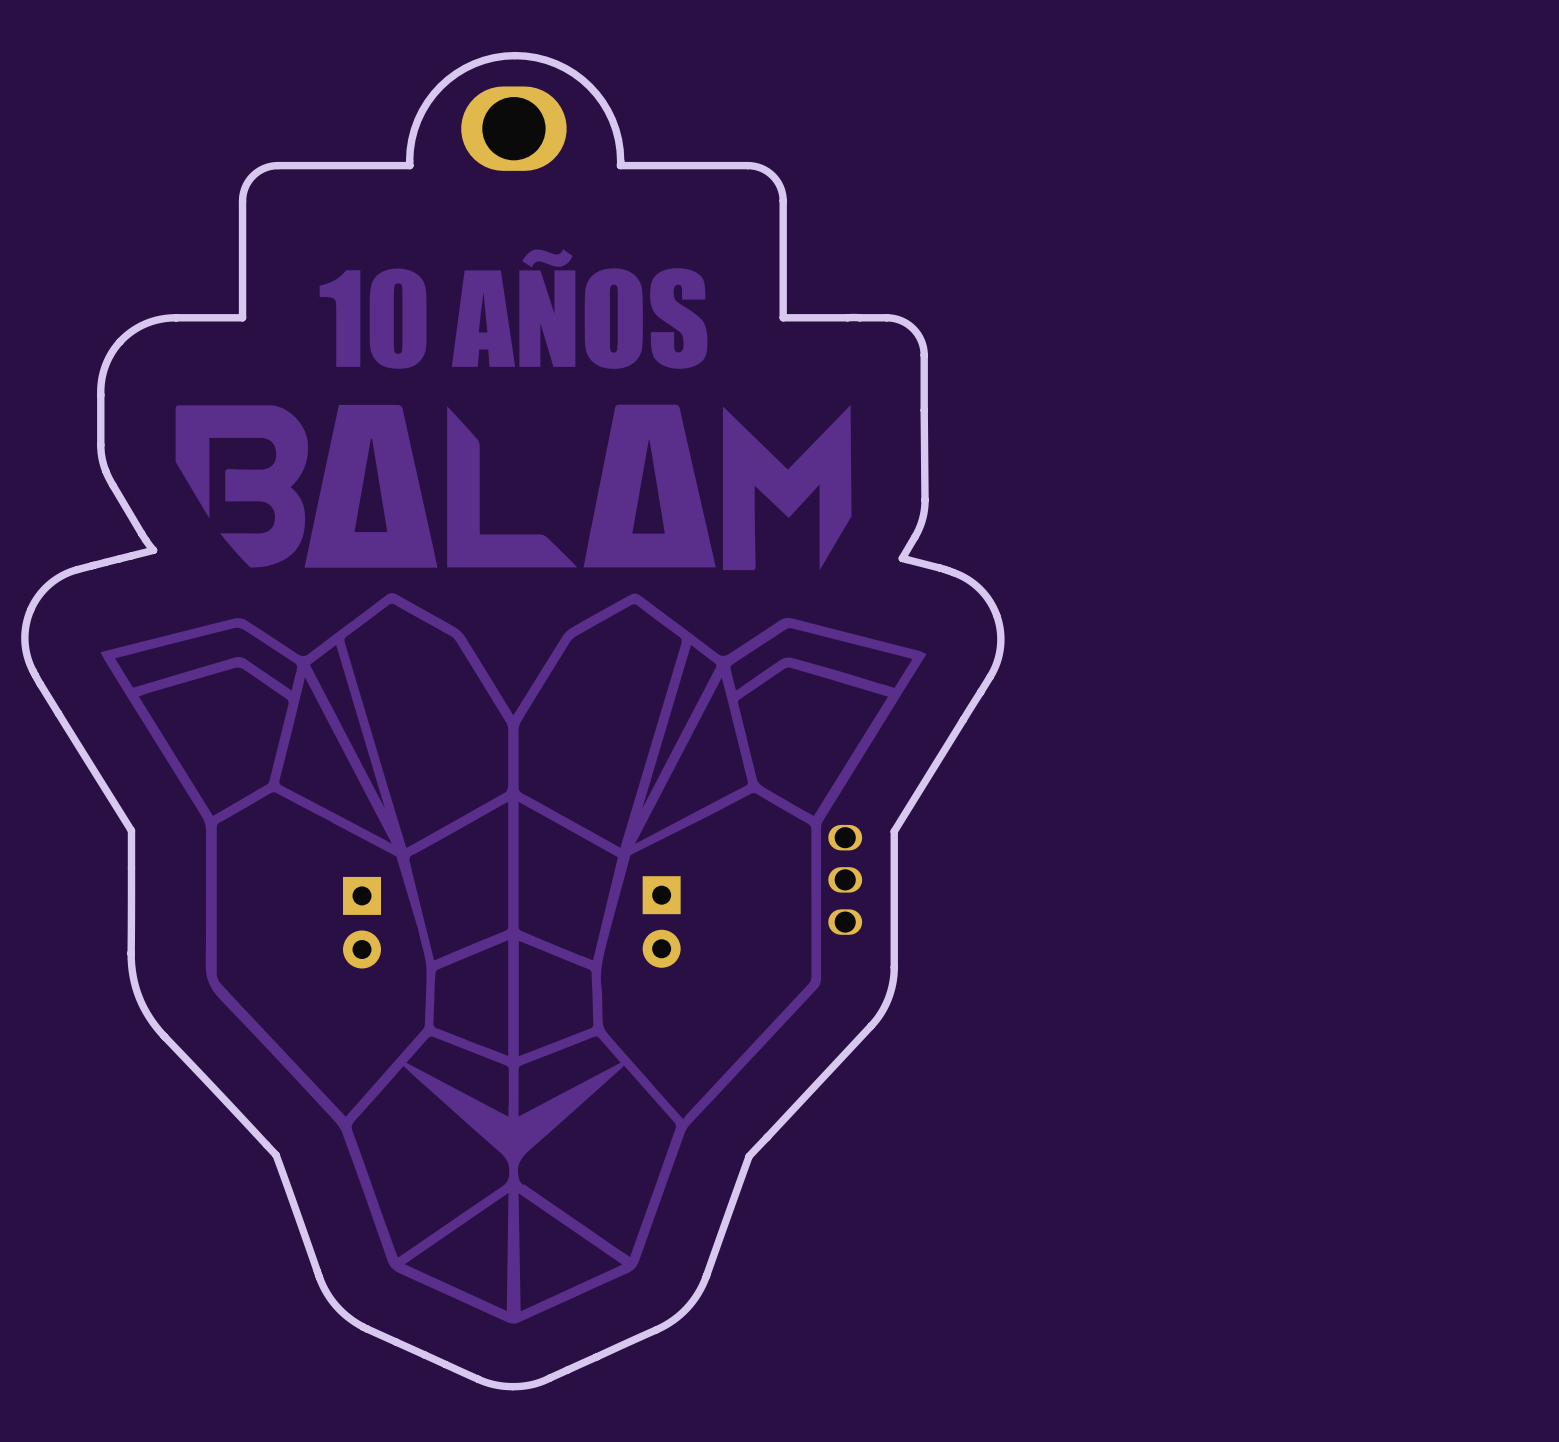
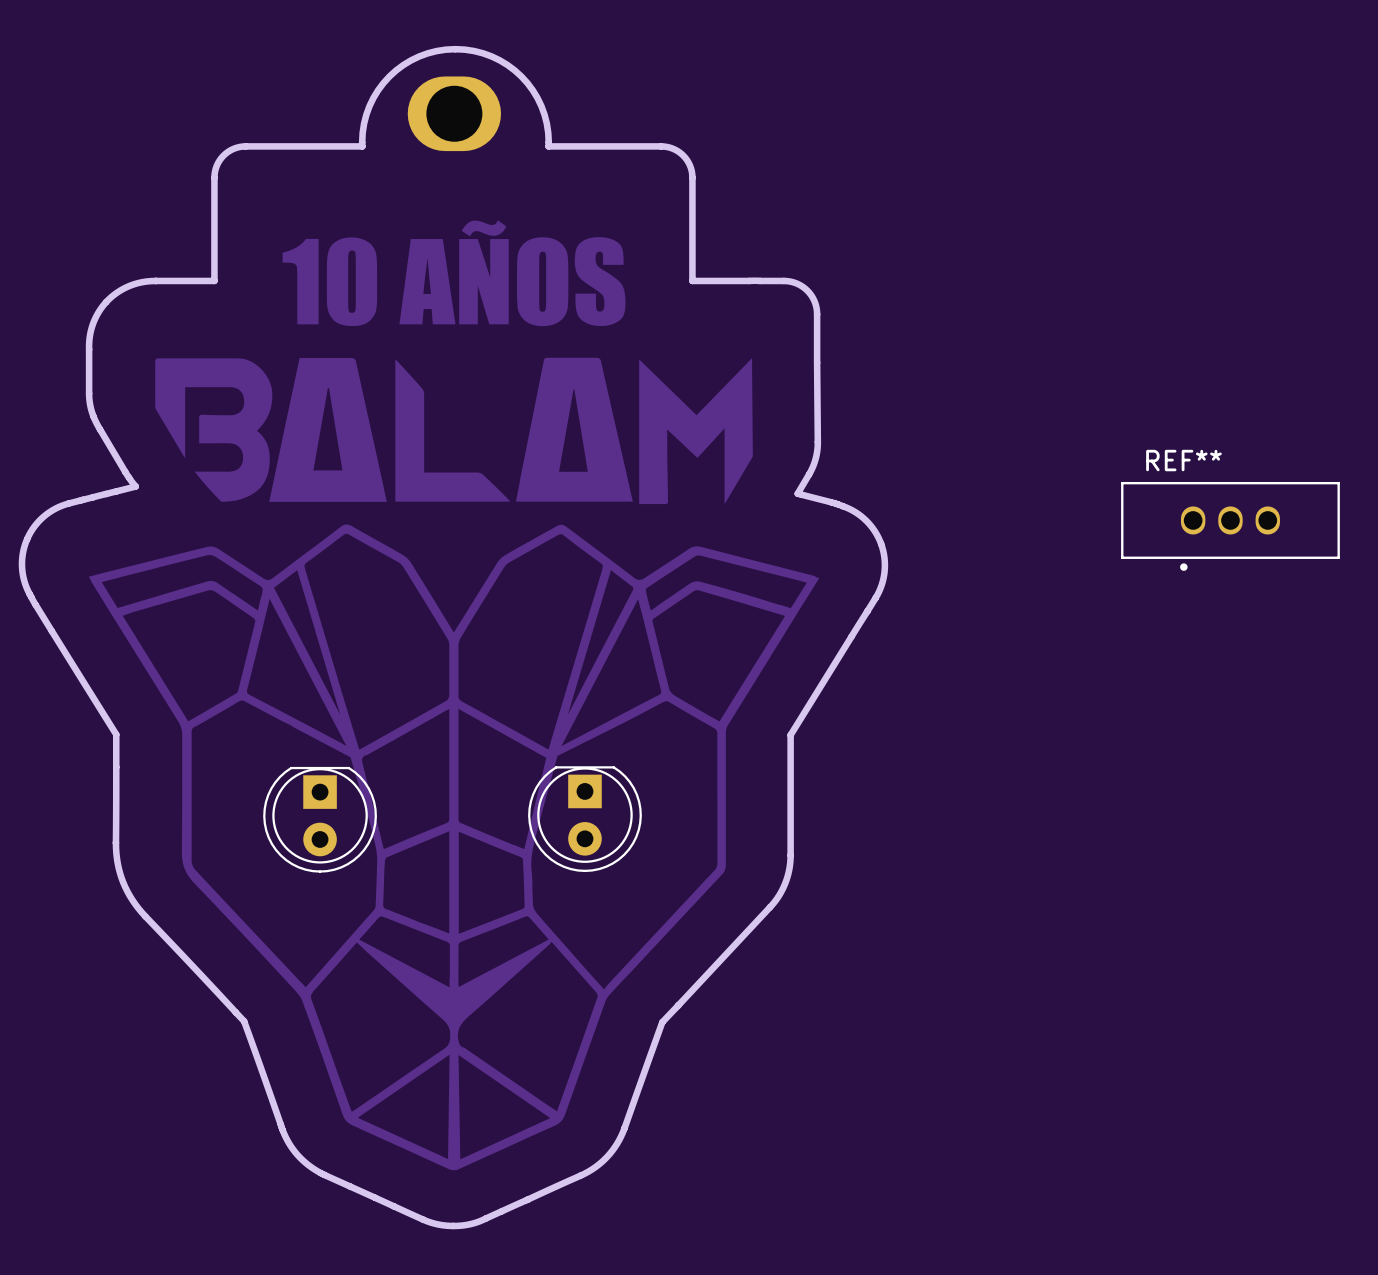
REF**: none -> (1230, 526)
part footprint: [343, 876, 382, 969] -> [263, 766, 377, 873]
part footprint: [642, 876, 681, 968] -> [528, 766, 642, 873]
part: (845, 879) -> none

